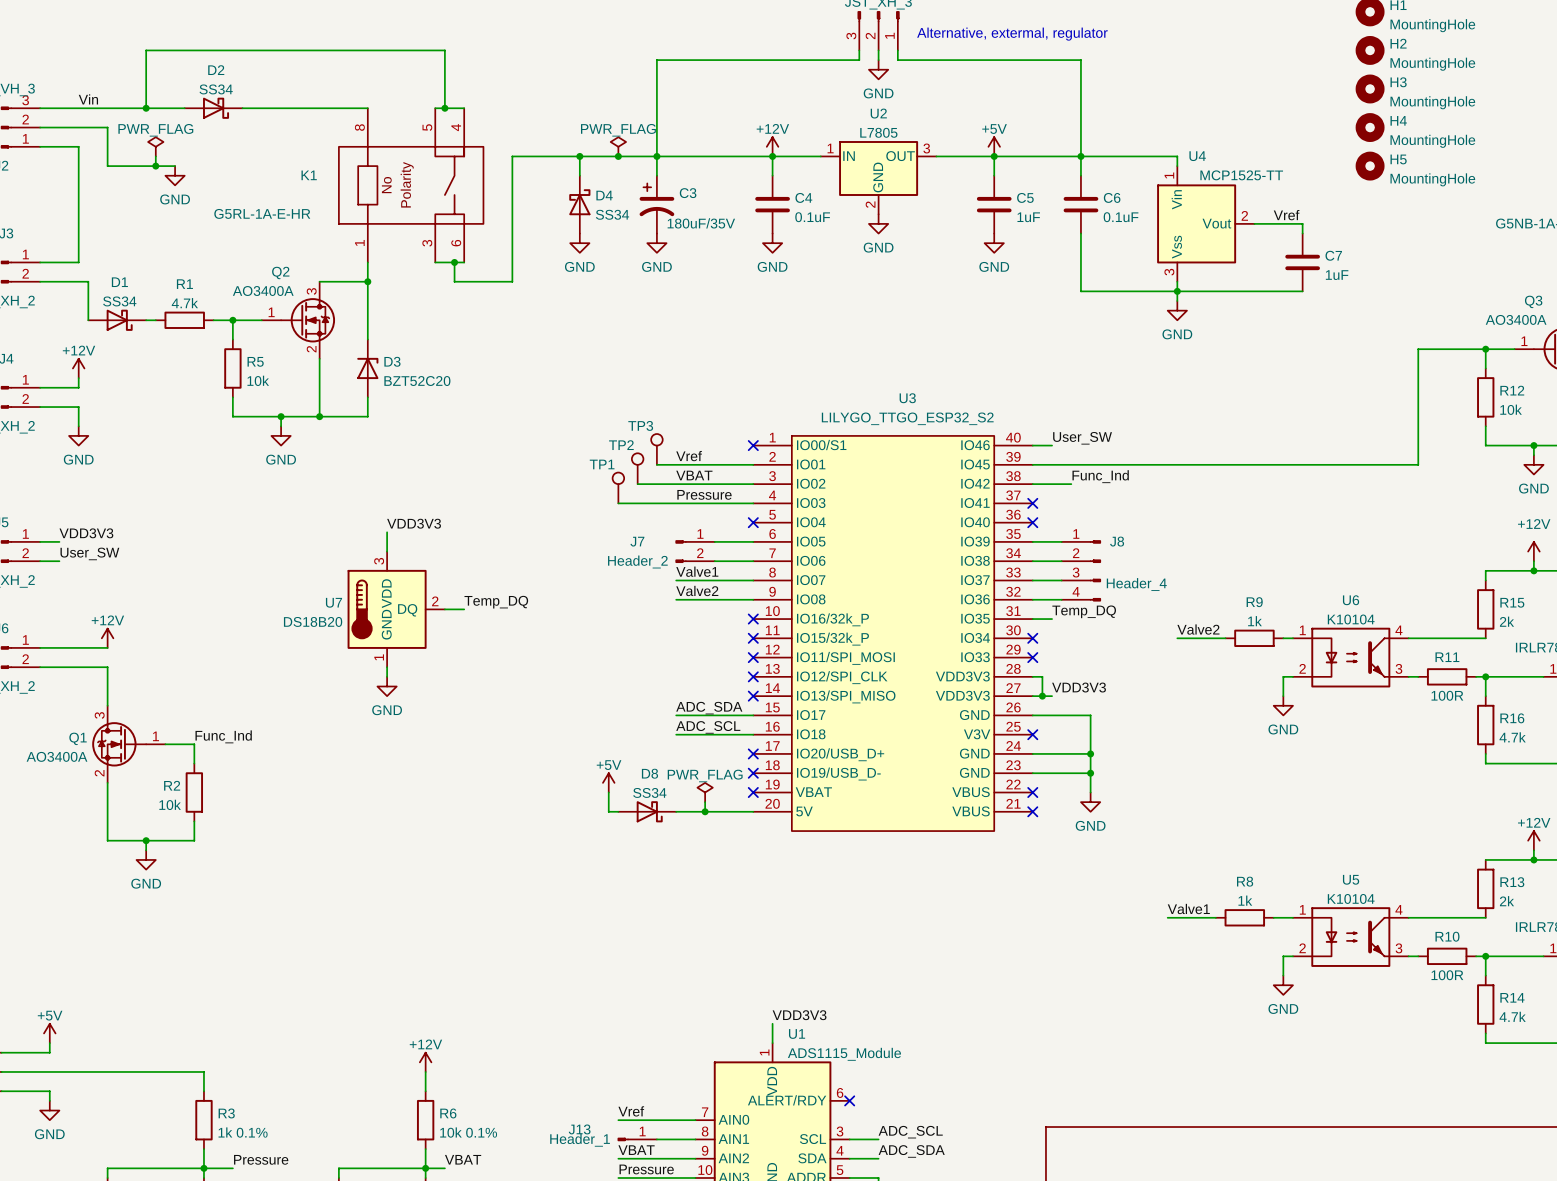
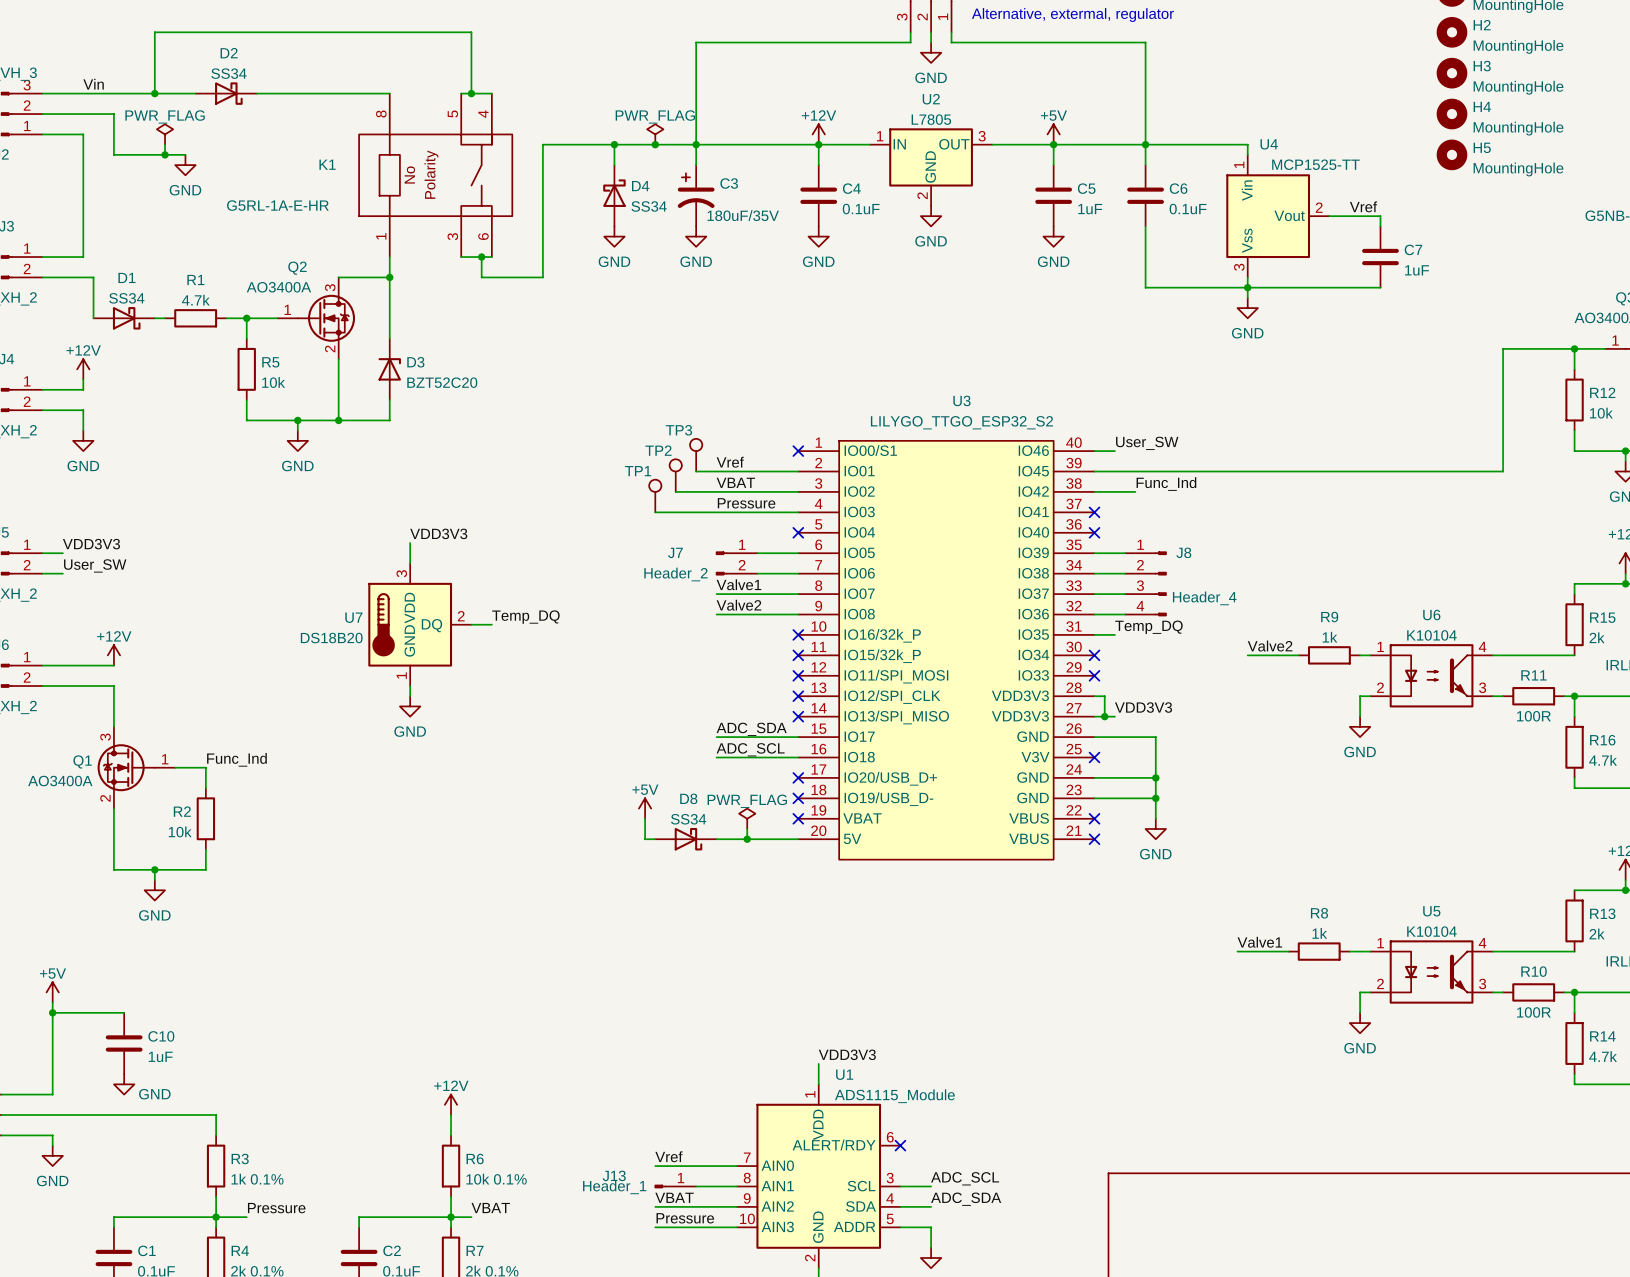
wire: none -> (52, 1002) (52, 1084)
wire: none -> (52, 1012) (124, 1012)
junction: none -> (52, 1012)
C10: none -> 1uF (124, 1043)
power symbol position: +5V (49, 1033) -> +5V (52, 992)
power symbol: none -> GND (124, 1084)

